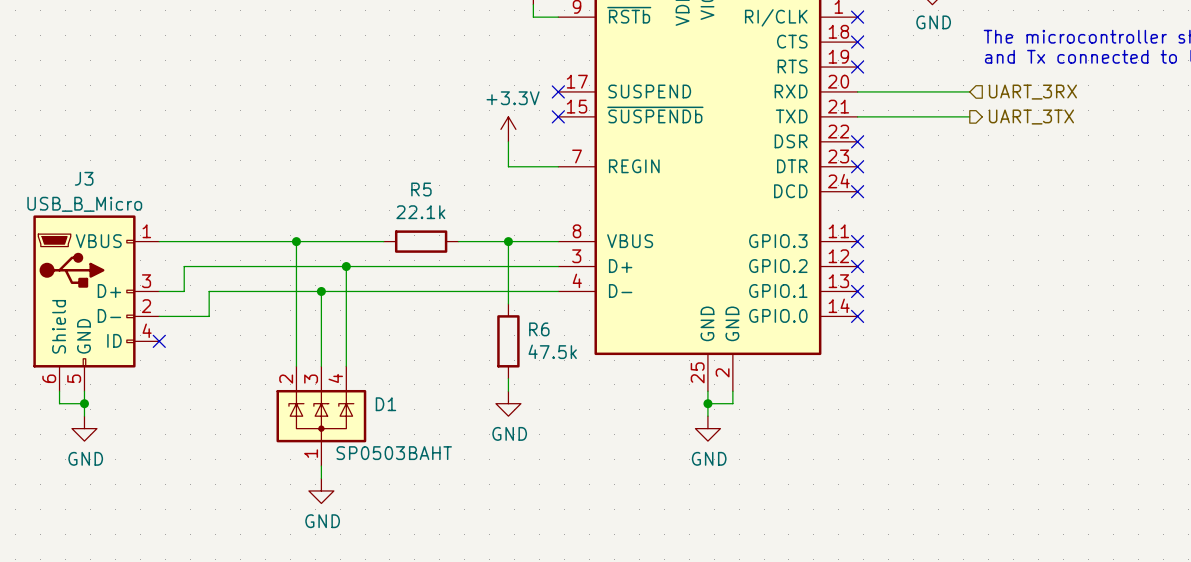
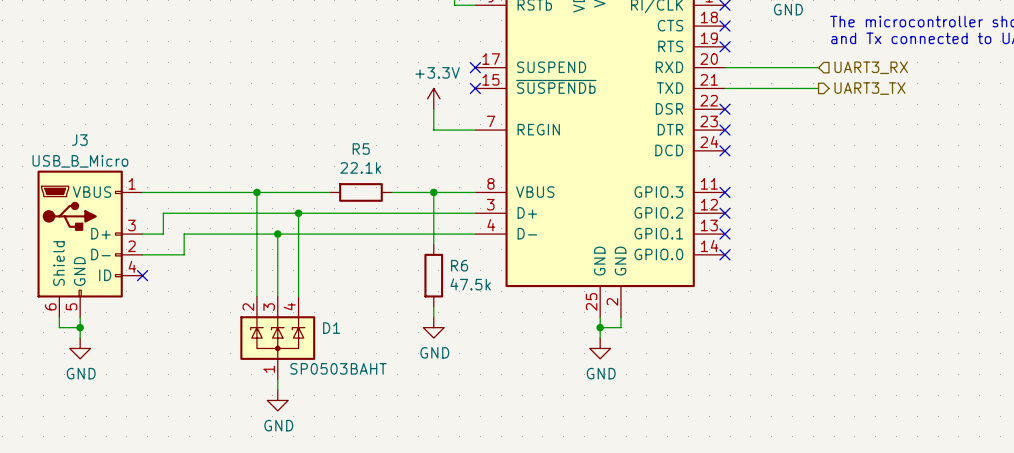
hierarchical label: UART_3RX (1032, 92) -> UART3_RX (871, 67)
hierarchical label: UART_3TX (1031, 117) -> UART3_TX (869, 88)

